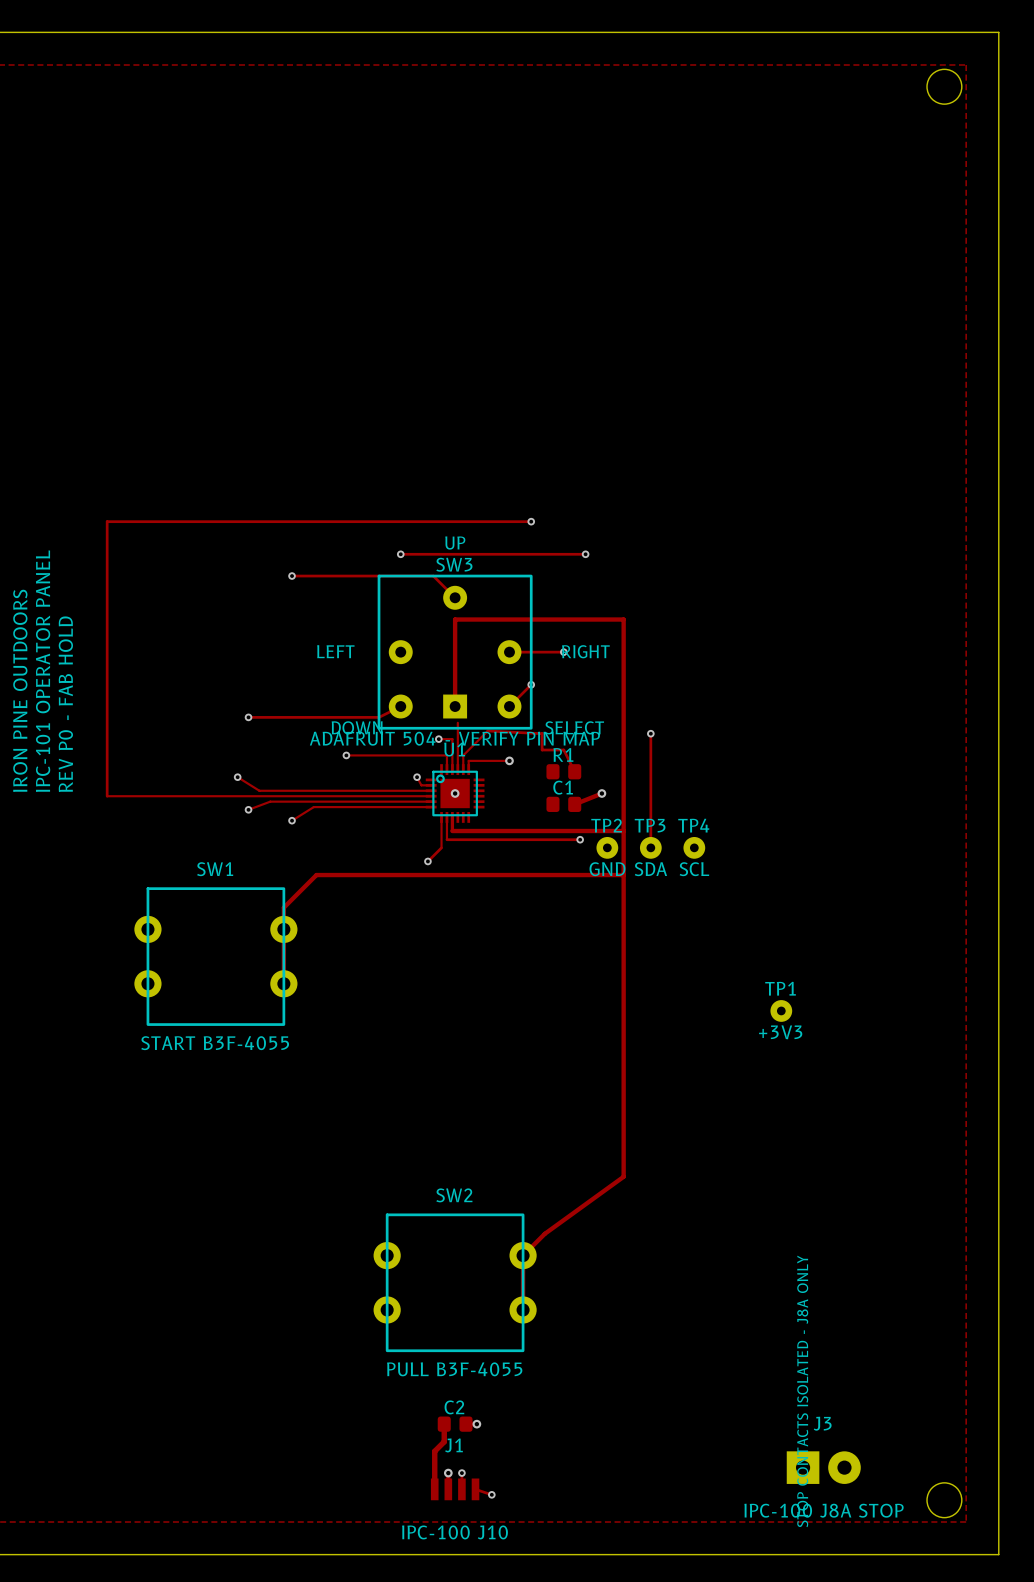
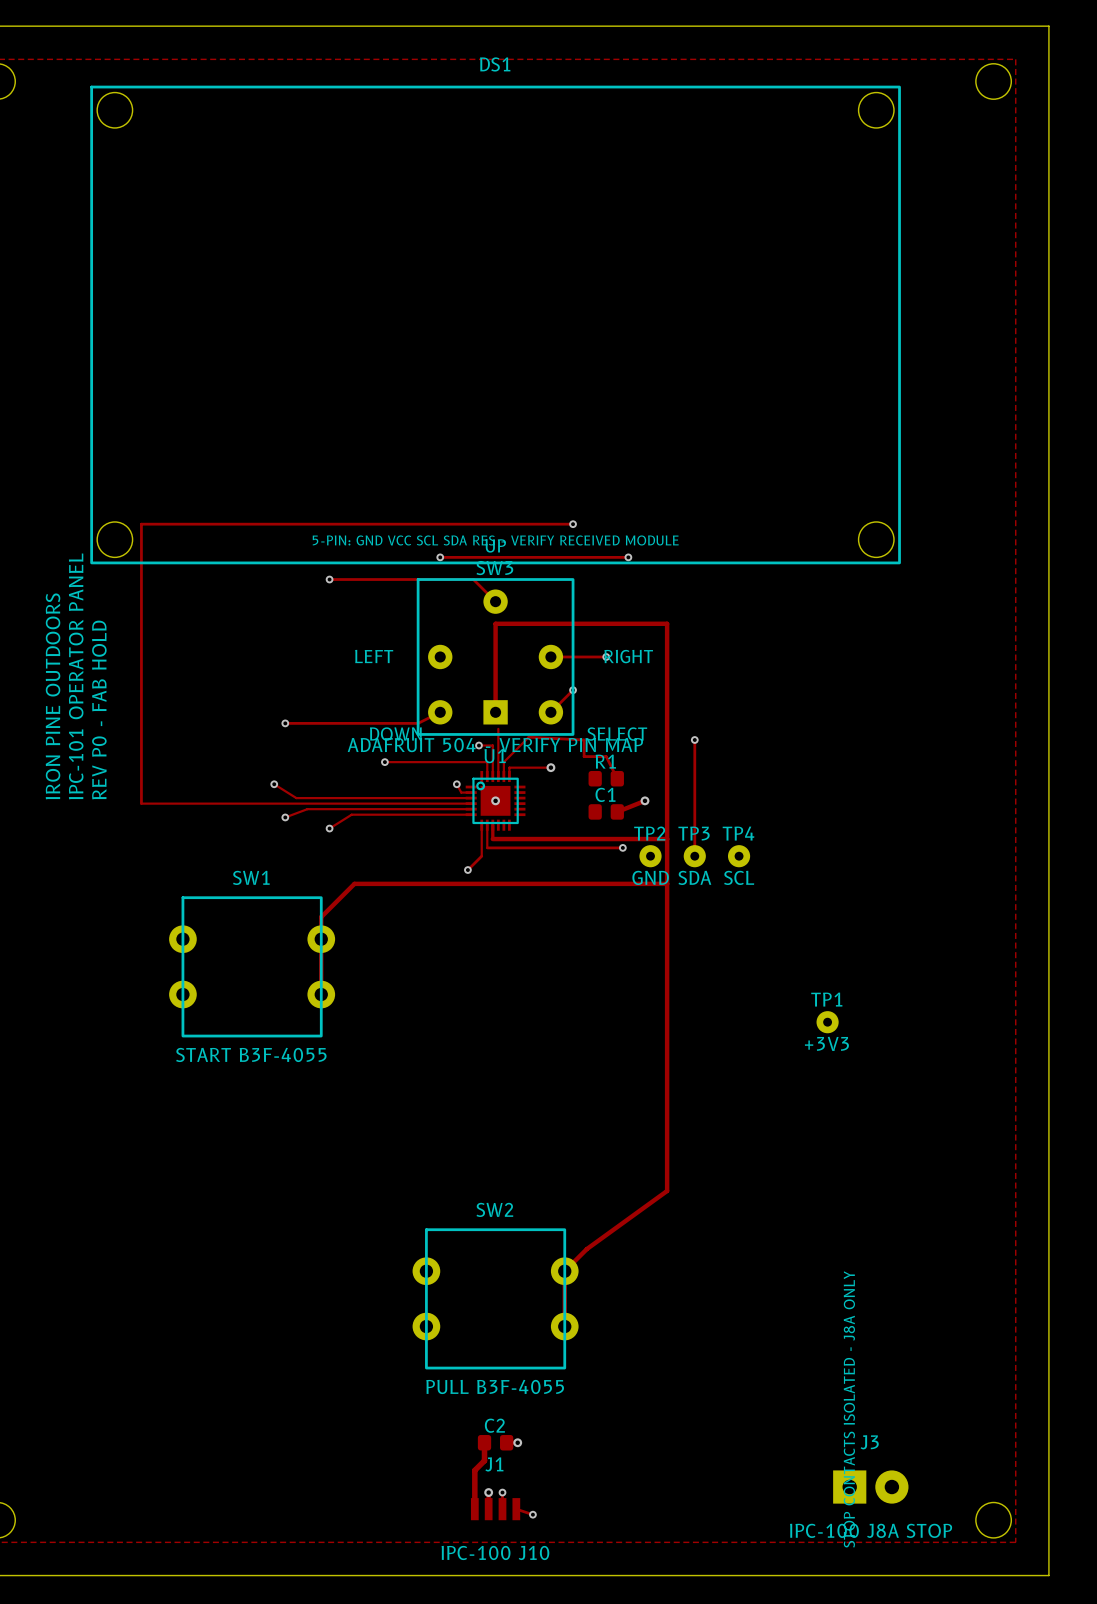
DS1: none -> (495, 324)

